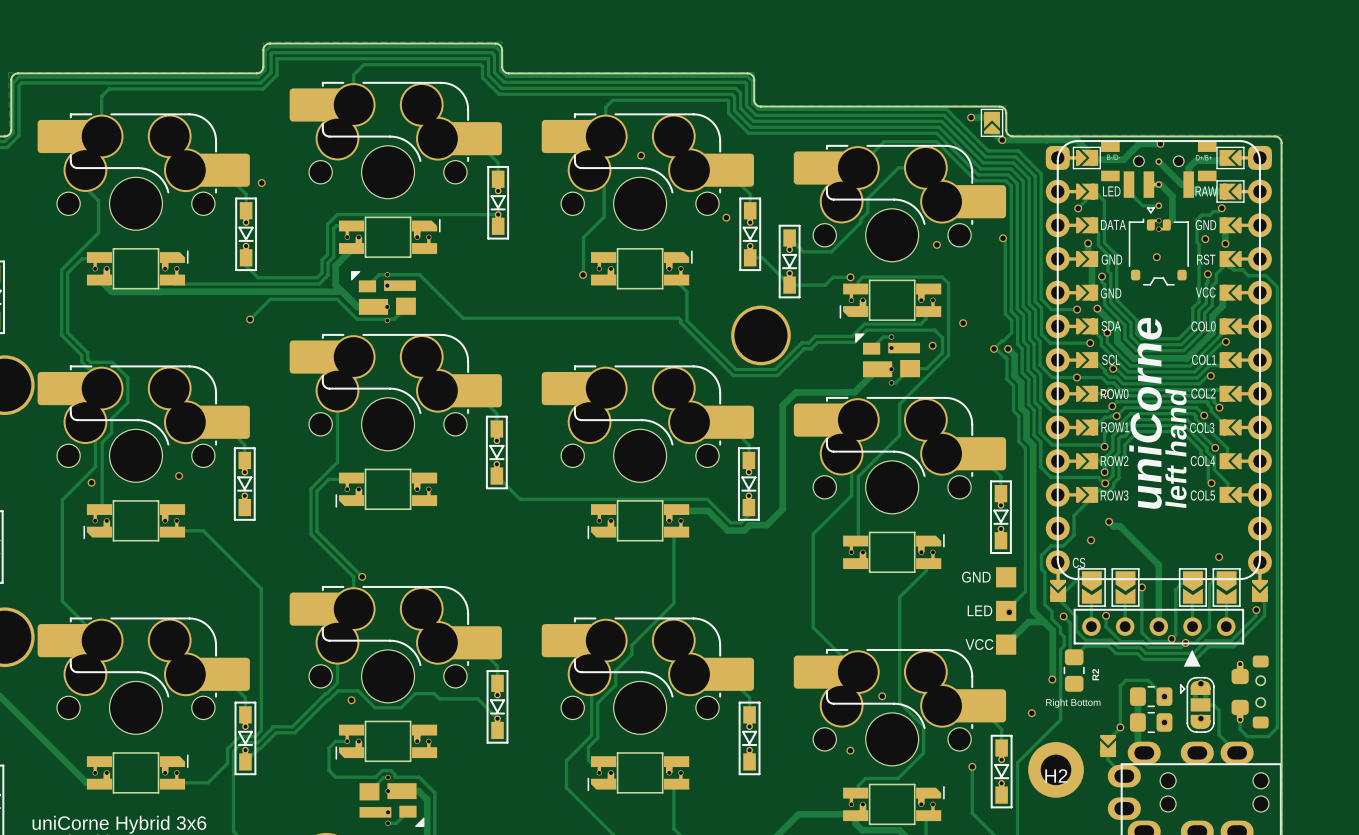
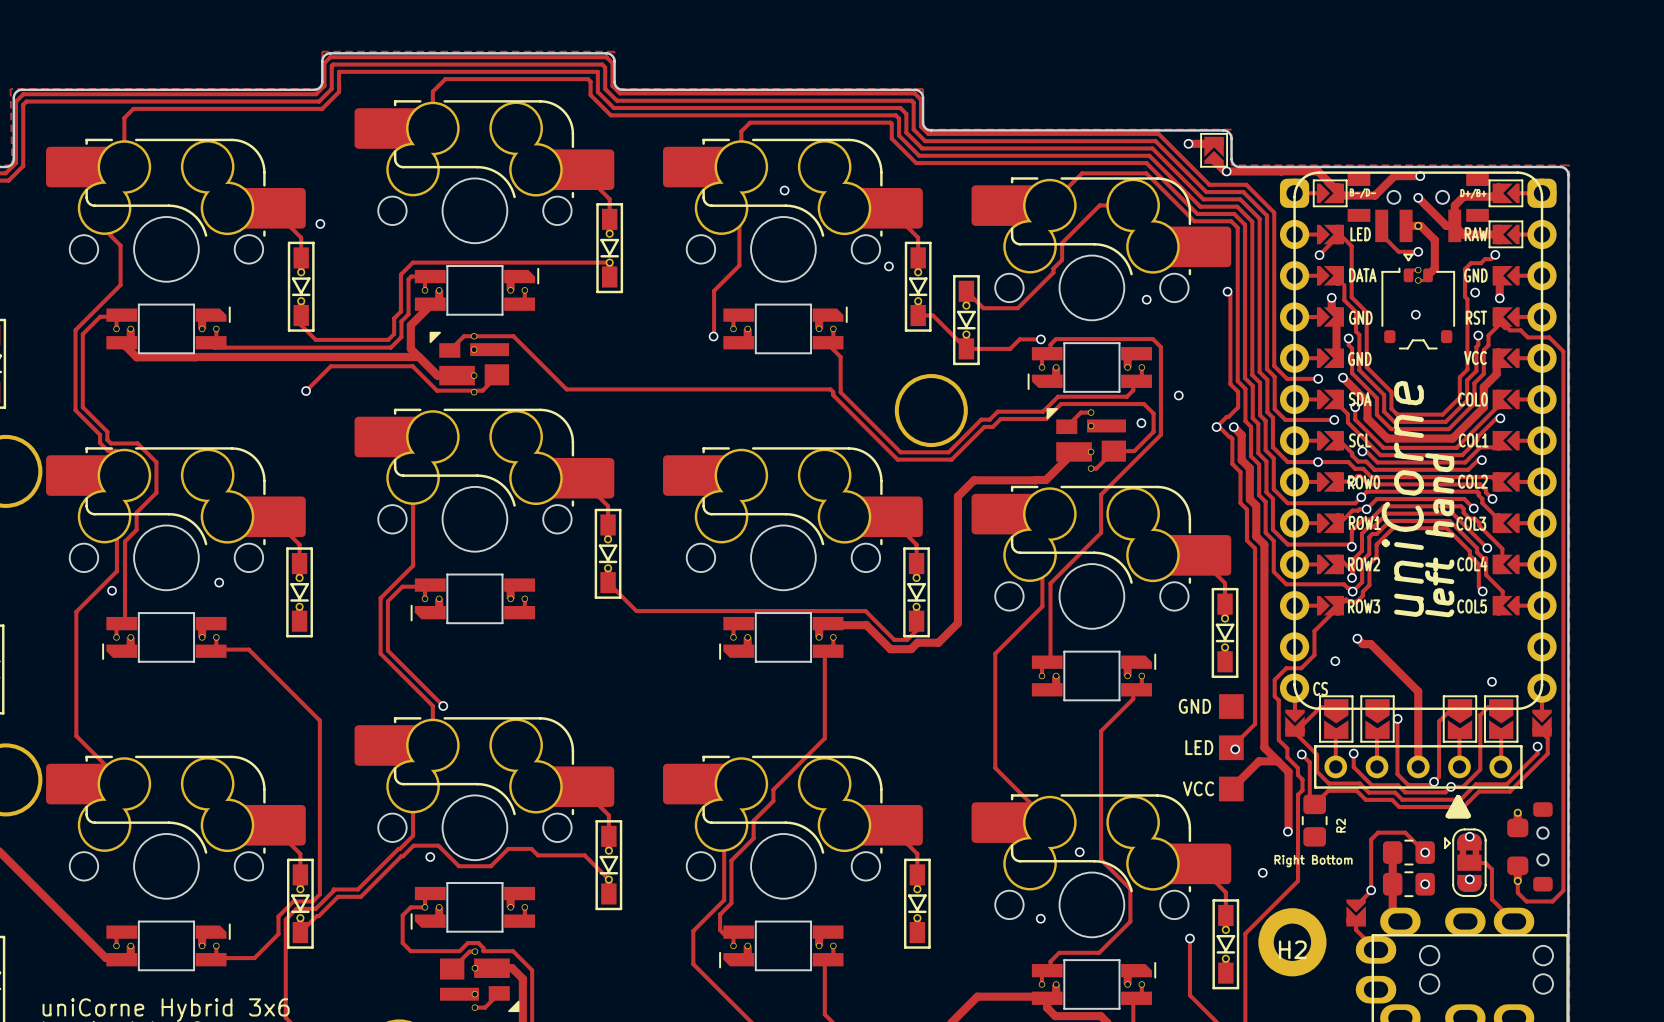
part footprint: [1101, 141, 1217, 210] -> [1347, 172, 1489, 243]
via: none -> (1418, 197)
via: none -> (1418, 251)

